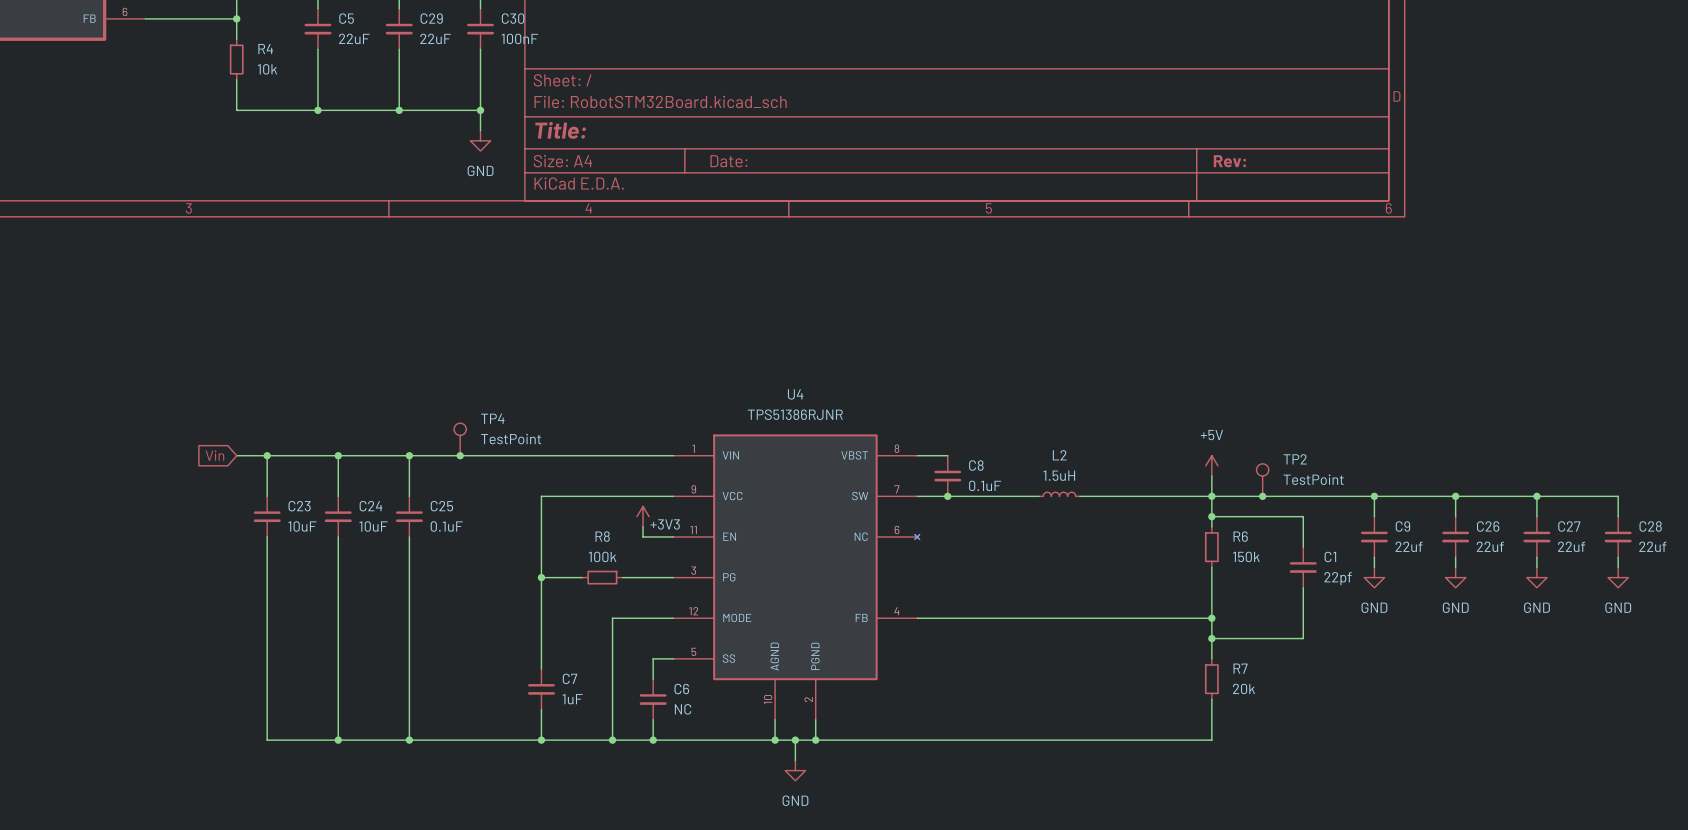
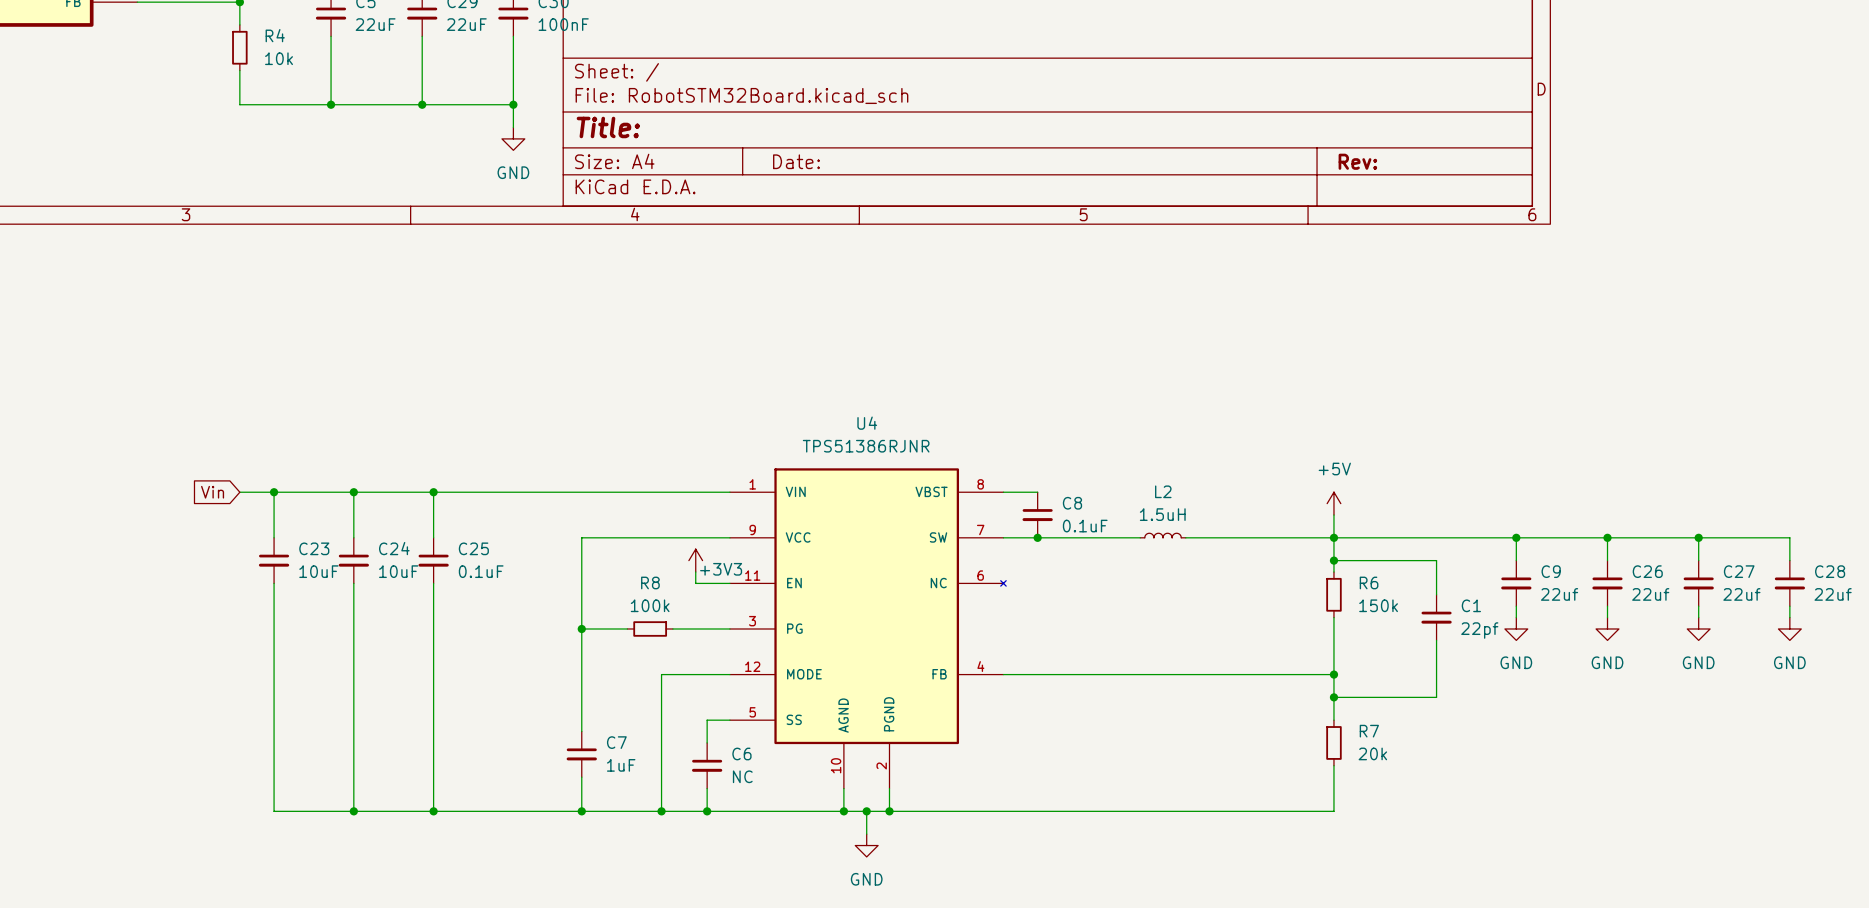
TP4: TestPoint (460, 439) -> none
junction: (460, 455) -> none
TP2: TestPoint (1262, 480) -> none
junction: (1262, 496) -> none

